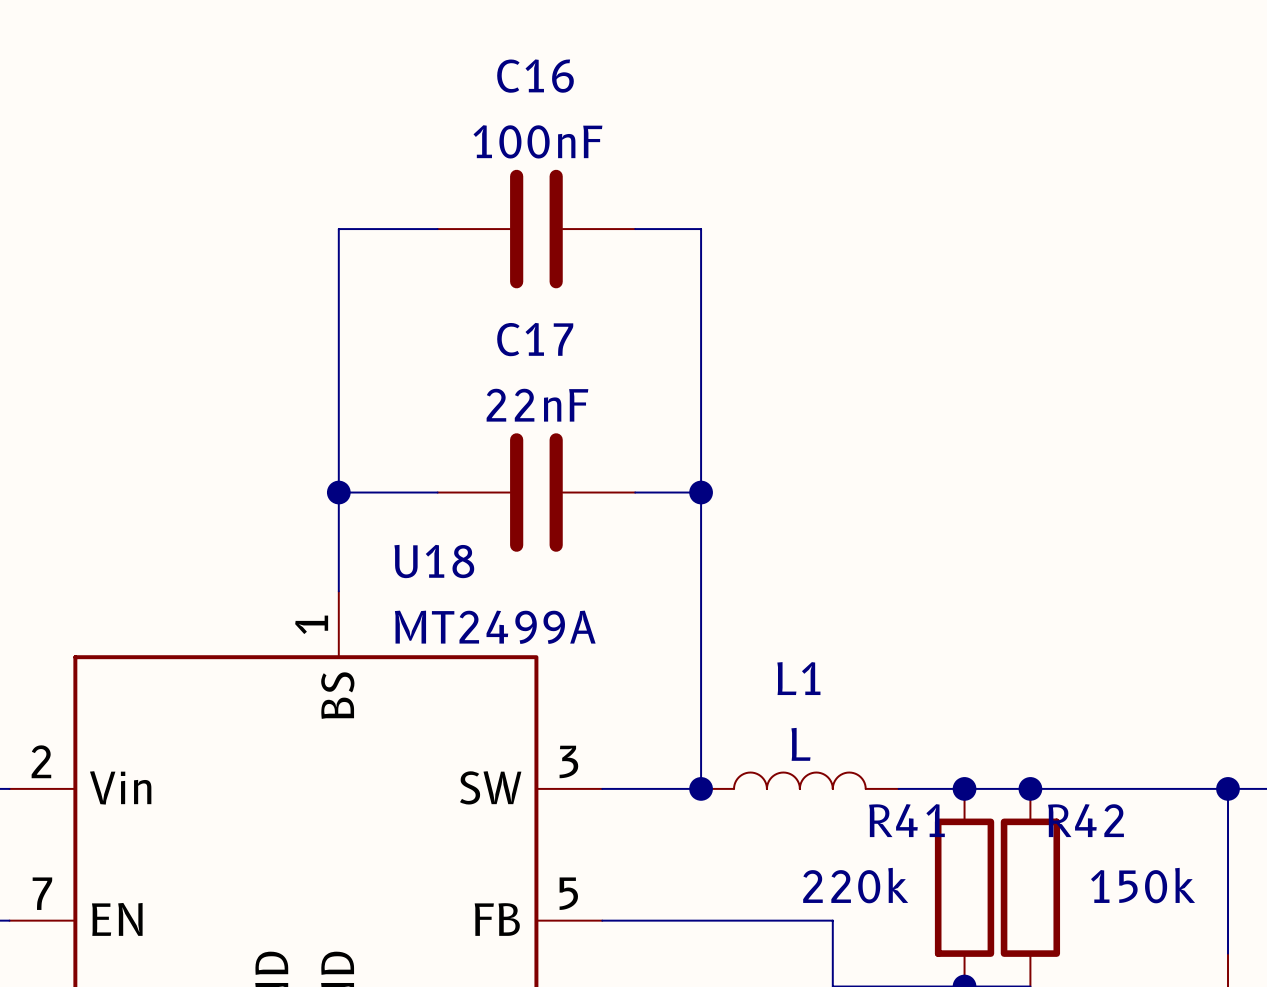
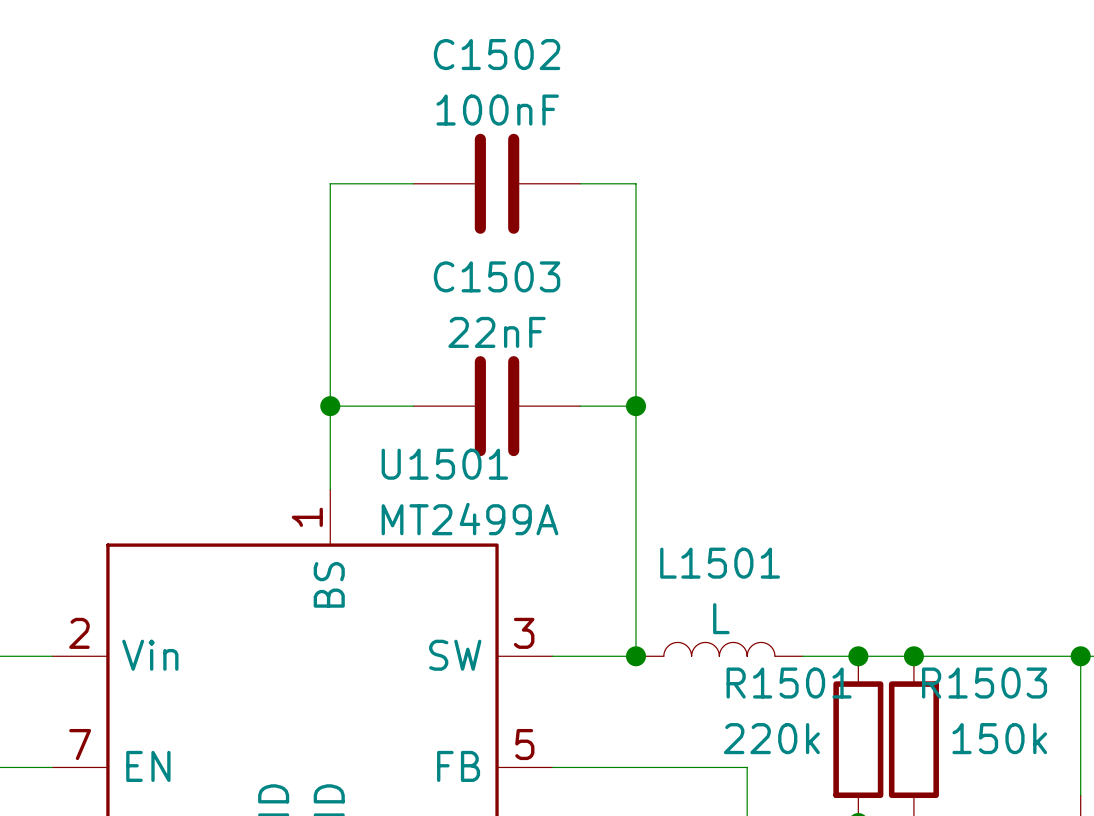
C16 name: C16 (535, 76) -> C1502 (497, 54)
C17 name: C17 (535, 339) -> C1503 (497, 276)
U18 name: U18 (434, 561) -> U1501 (444, 464)
L1 name: L1 (798, 678) -> L1501 (720, 563)
R41 name: R41 (906, 820) -> R1501 (789, 683)
R42 name: R42 (1085, 820) -> R1503 (984, 683)

